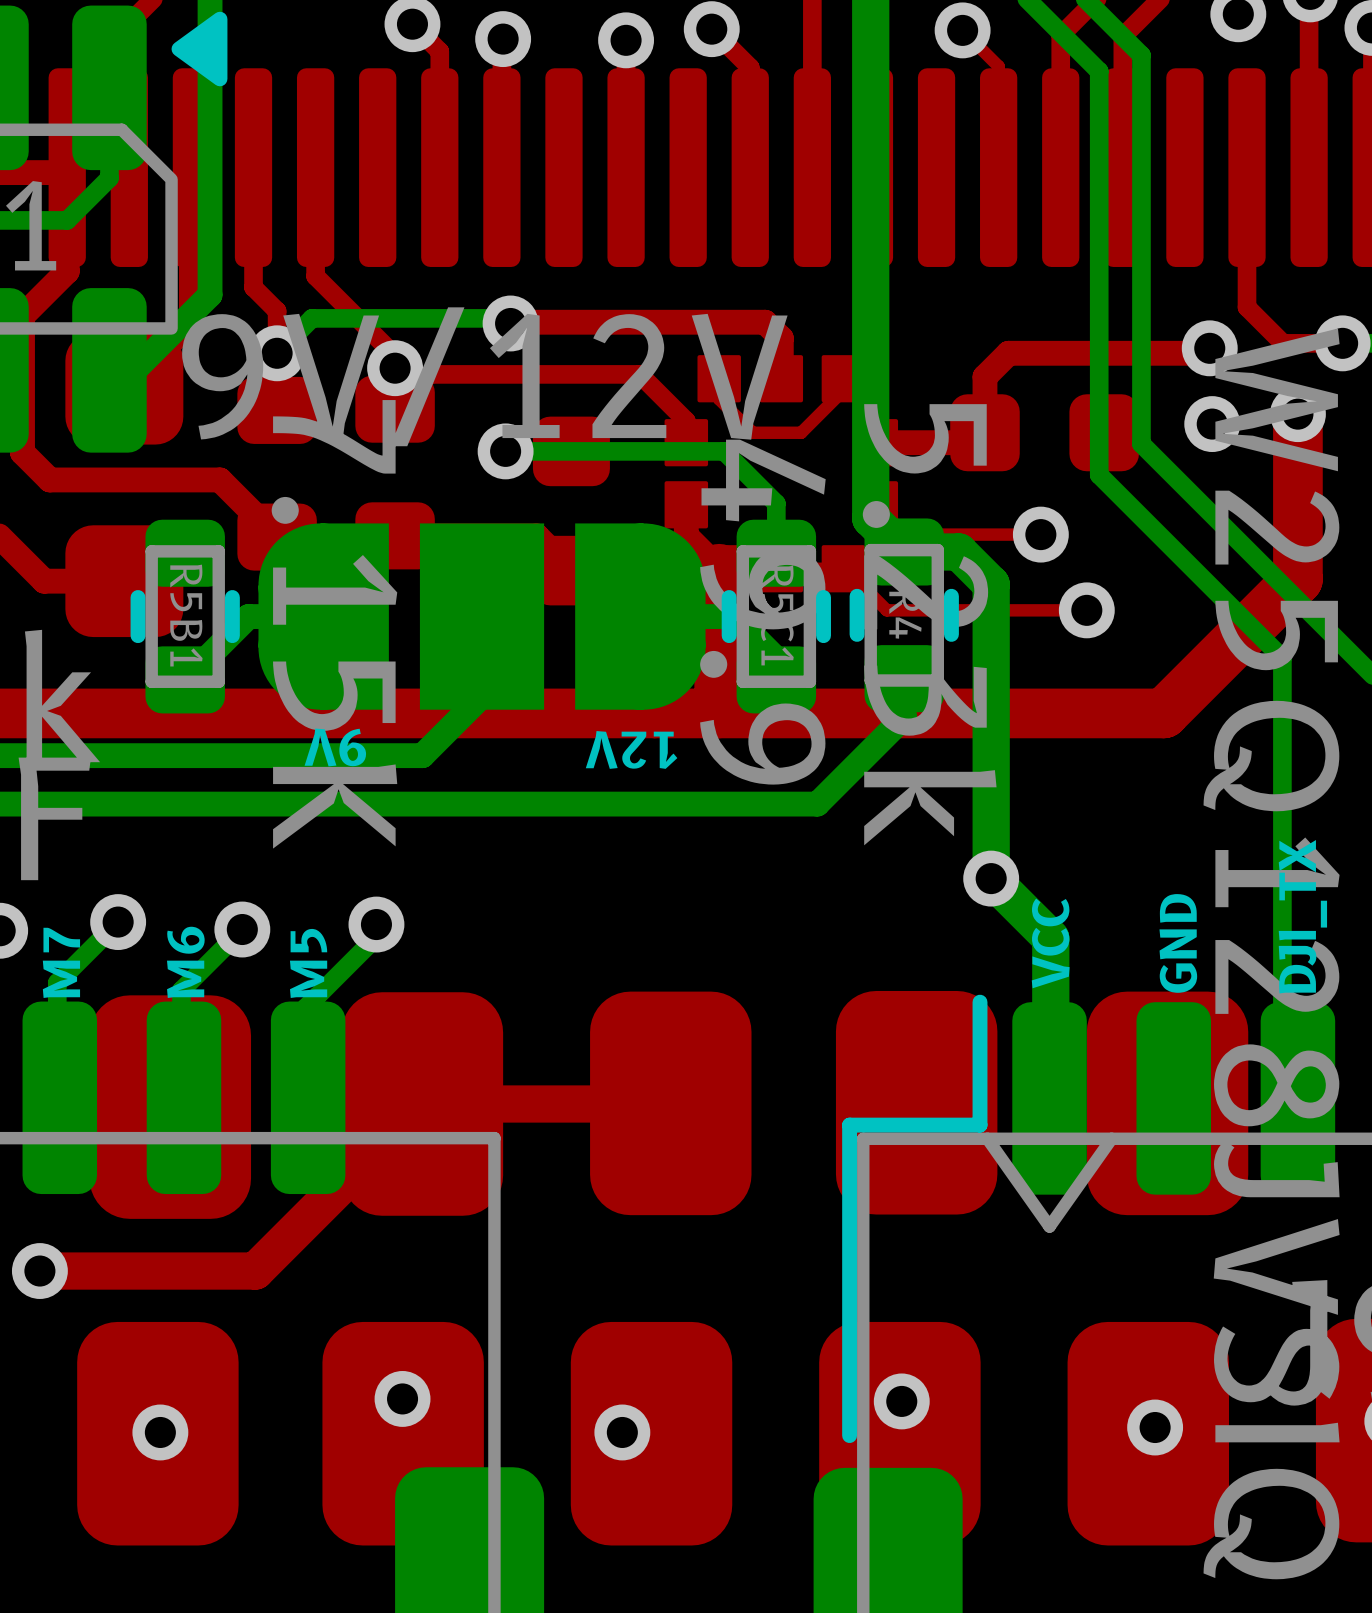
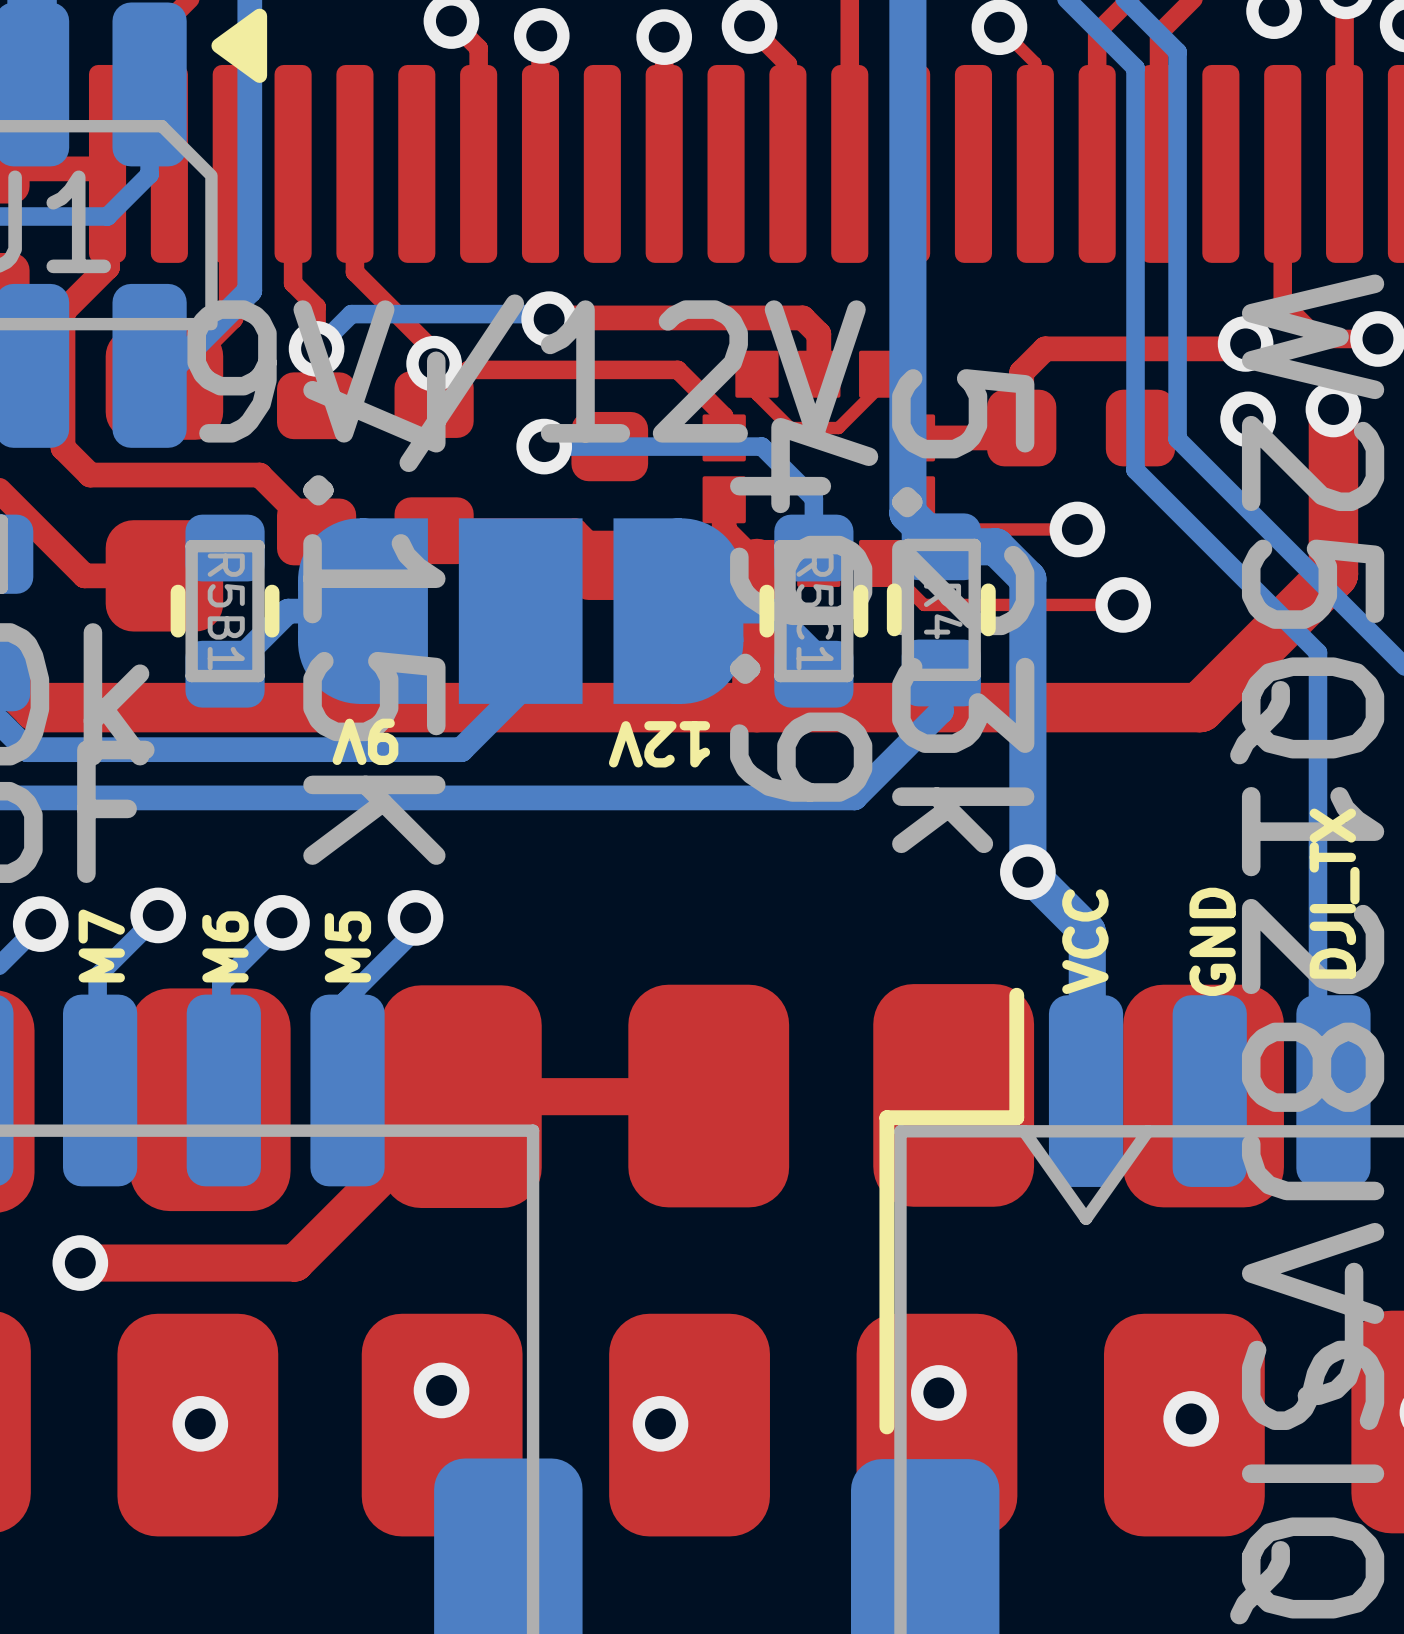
text position: VCC (1050, 943) -> VCC (1085, 941)
text position: GND (1178, 943) -> GND (1212, 941)

